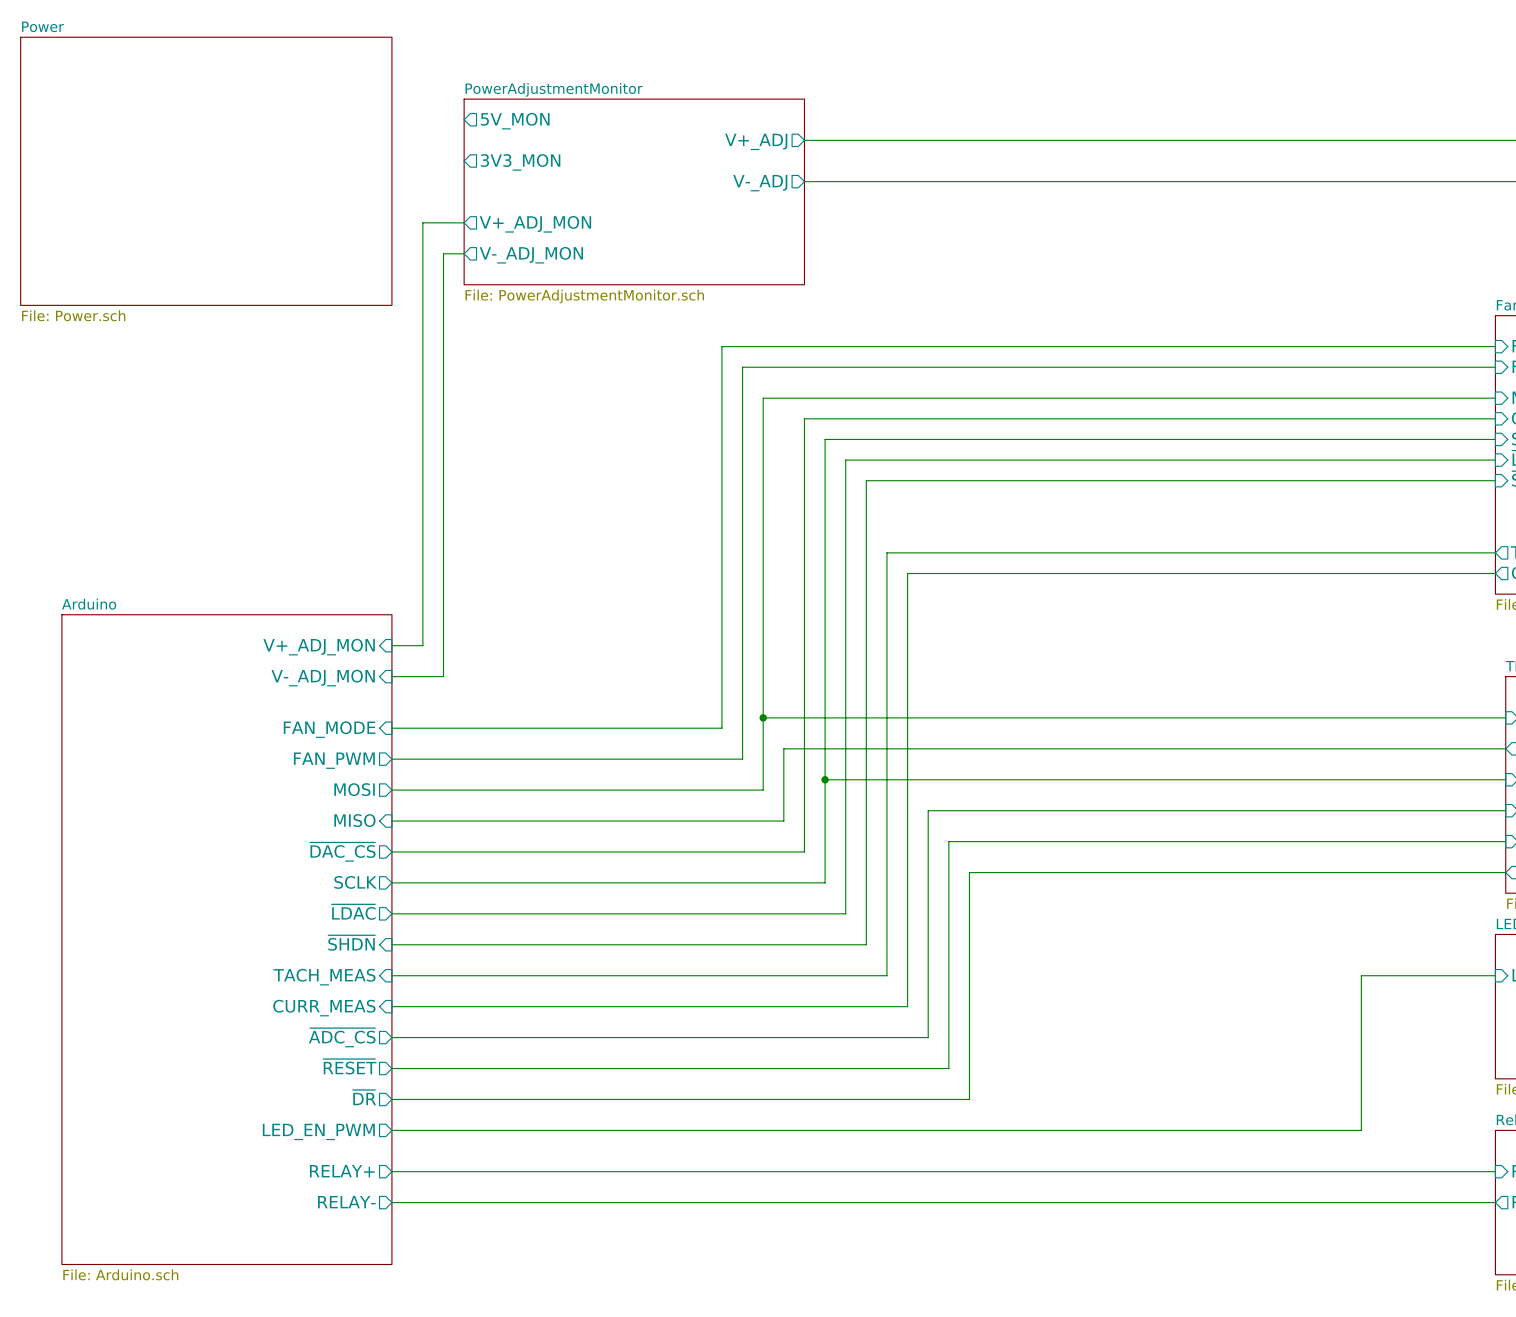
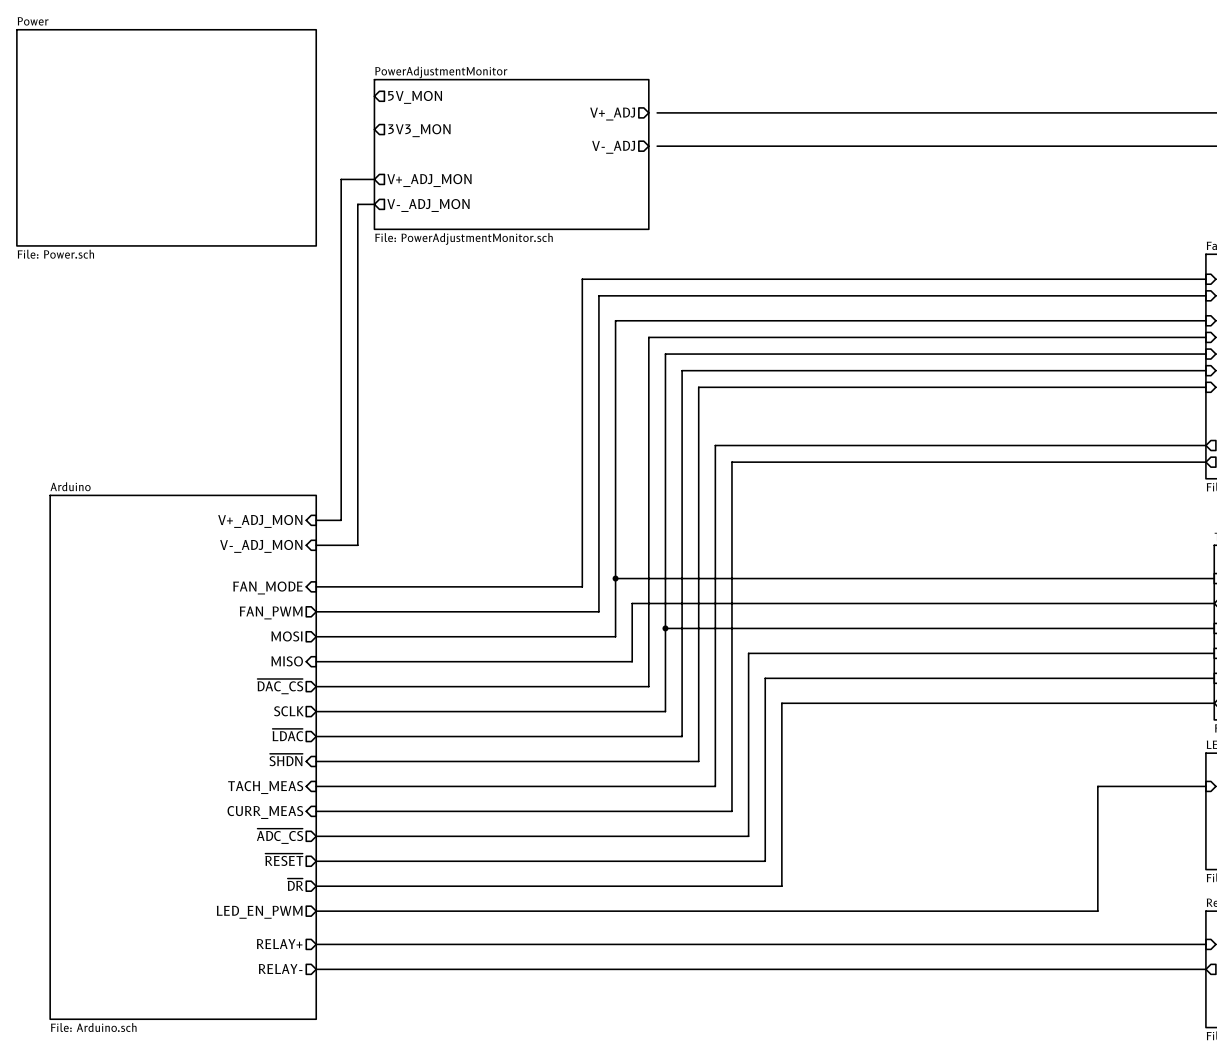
wire: (804, 140) (814, 140) -> none
wire: (804, 181) (814, 181) -> none

